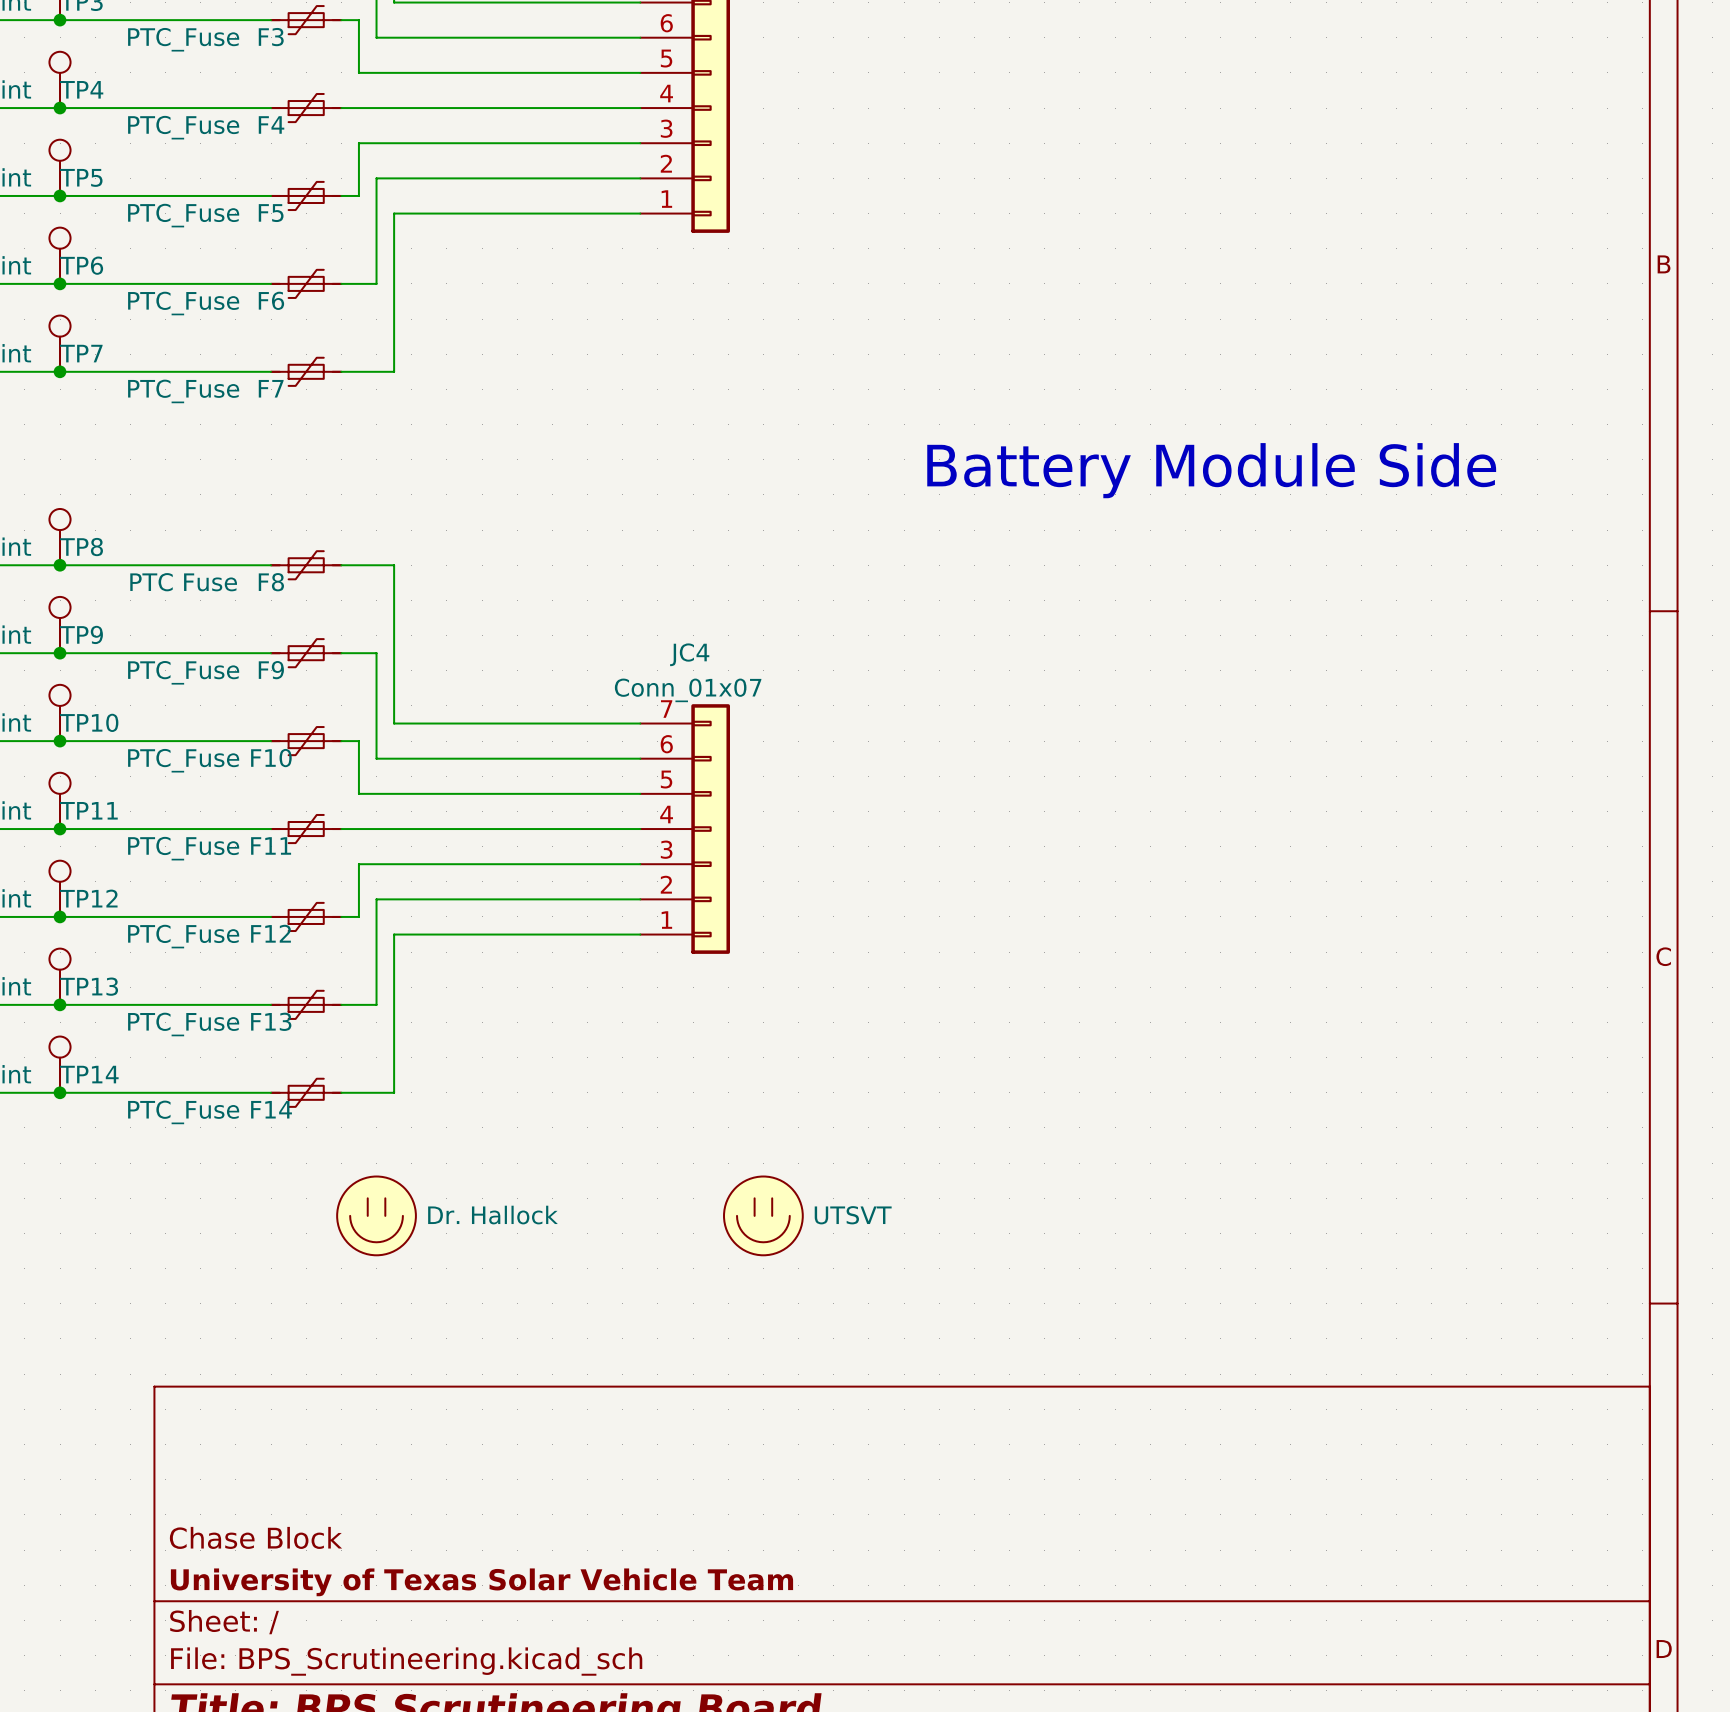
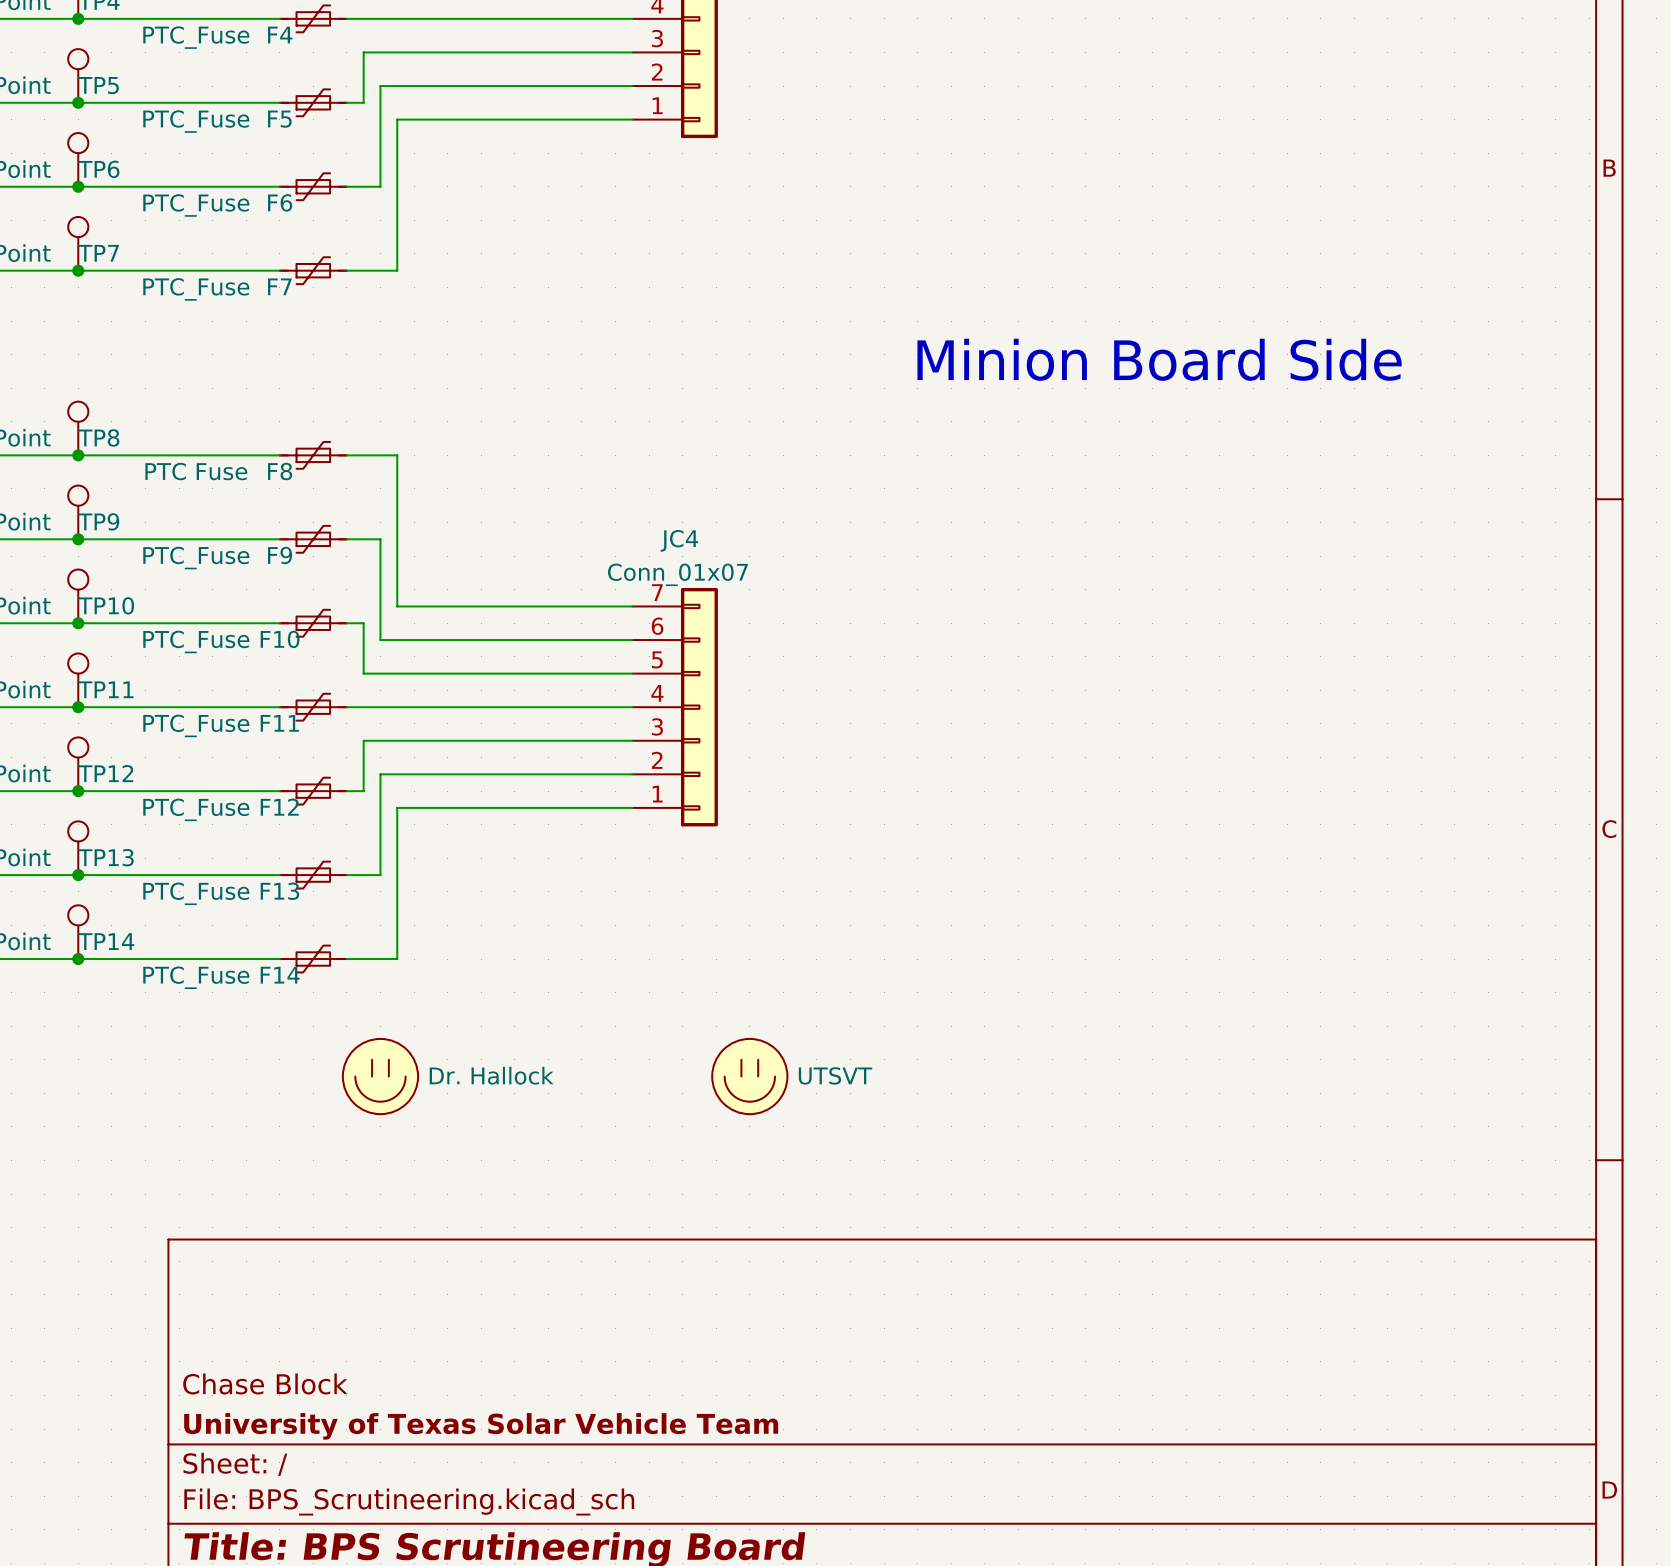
text: none -> Minion Board Side (1159, 359)
text: Battery Module Side (1211, 470) -> none

